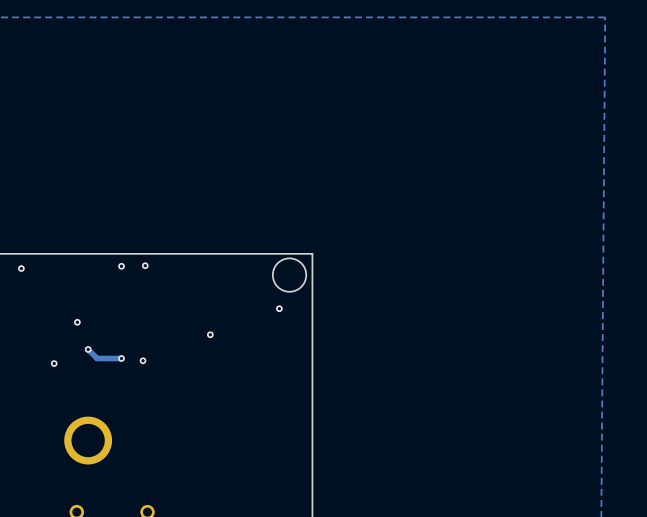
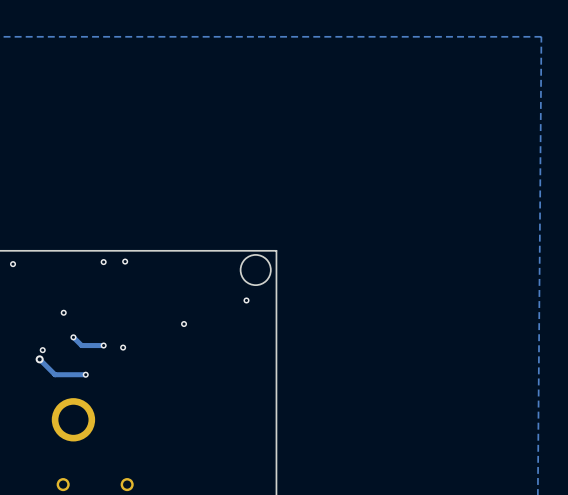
track: none -> (39, 359) (55, 374) (85, 374)
via: none -> (39, 359)
via: none -> (85, 374)

